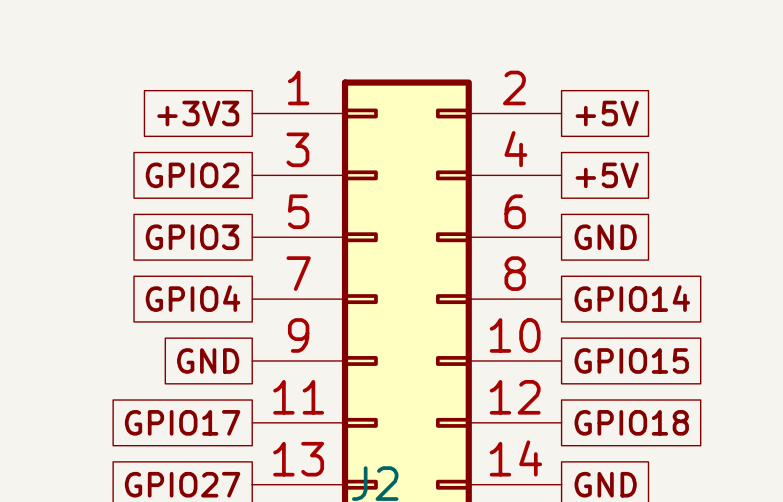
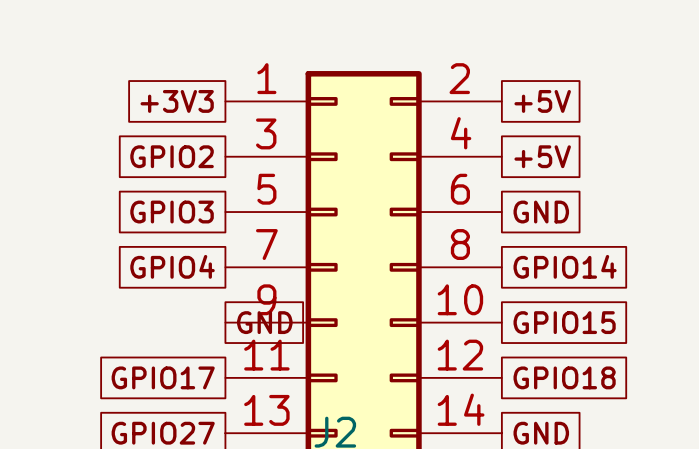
global label rotation: 0° (208, 360) -> 180° (264, 322)

